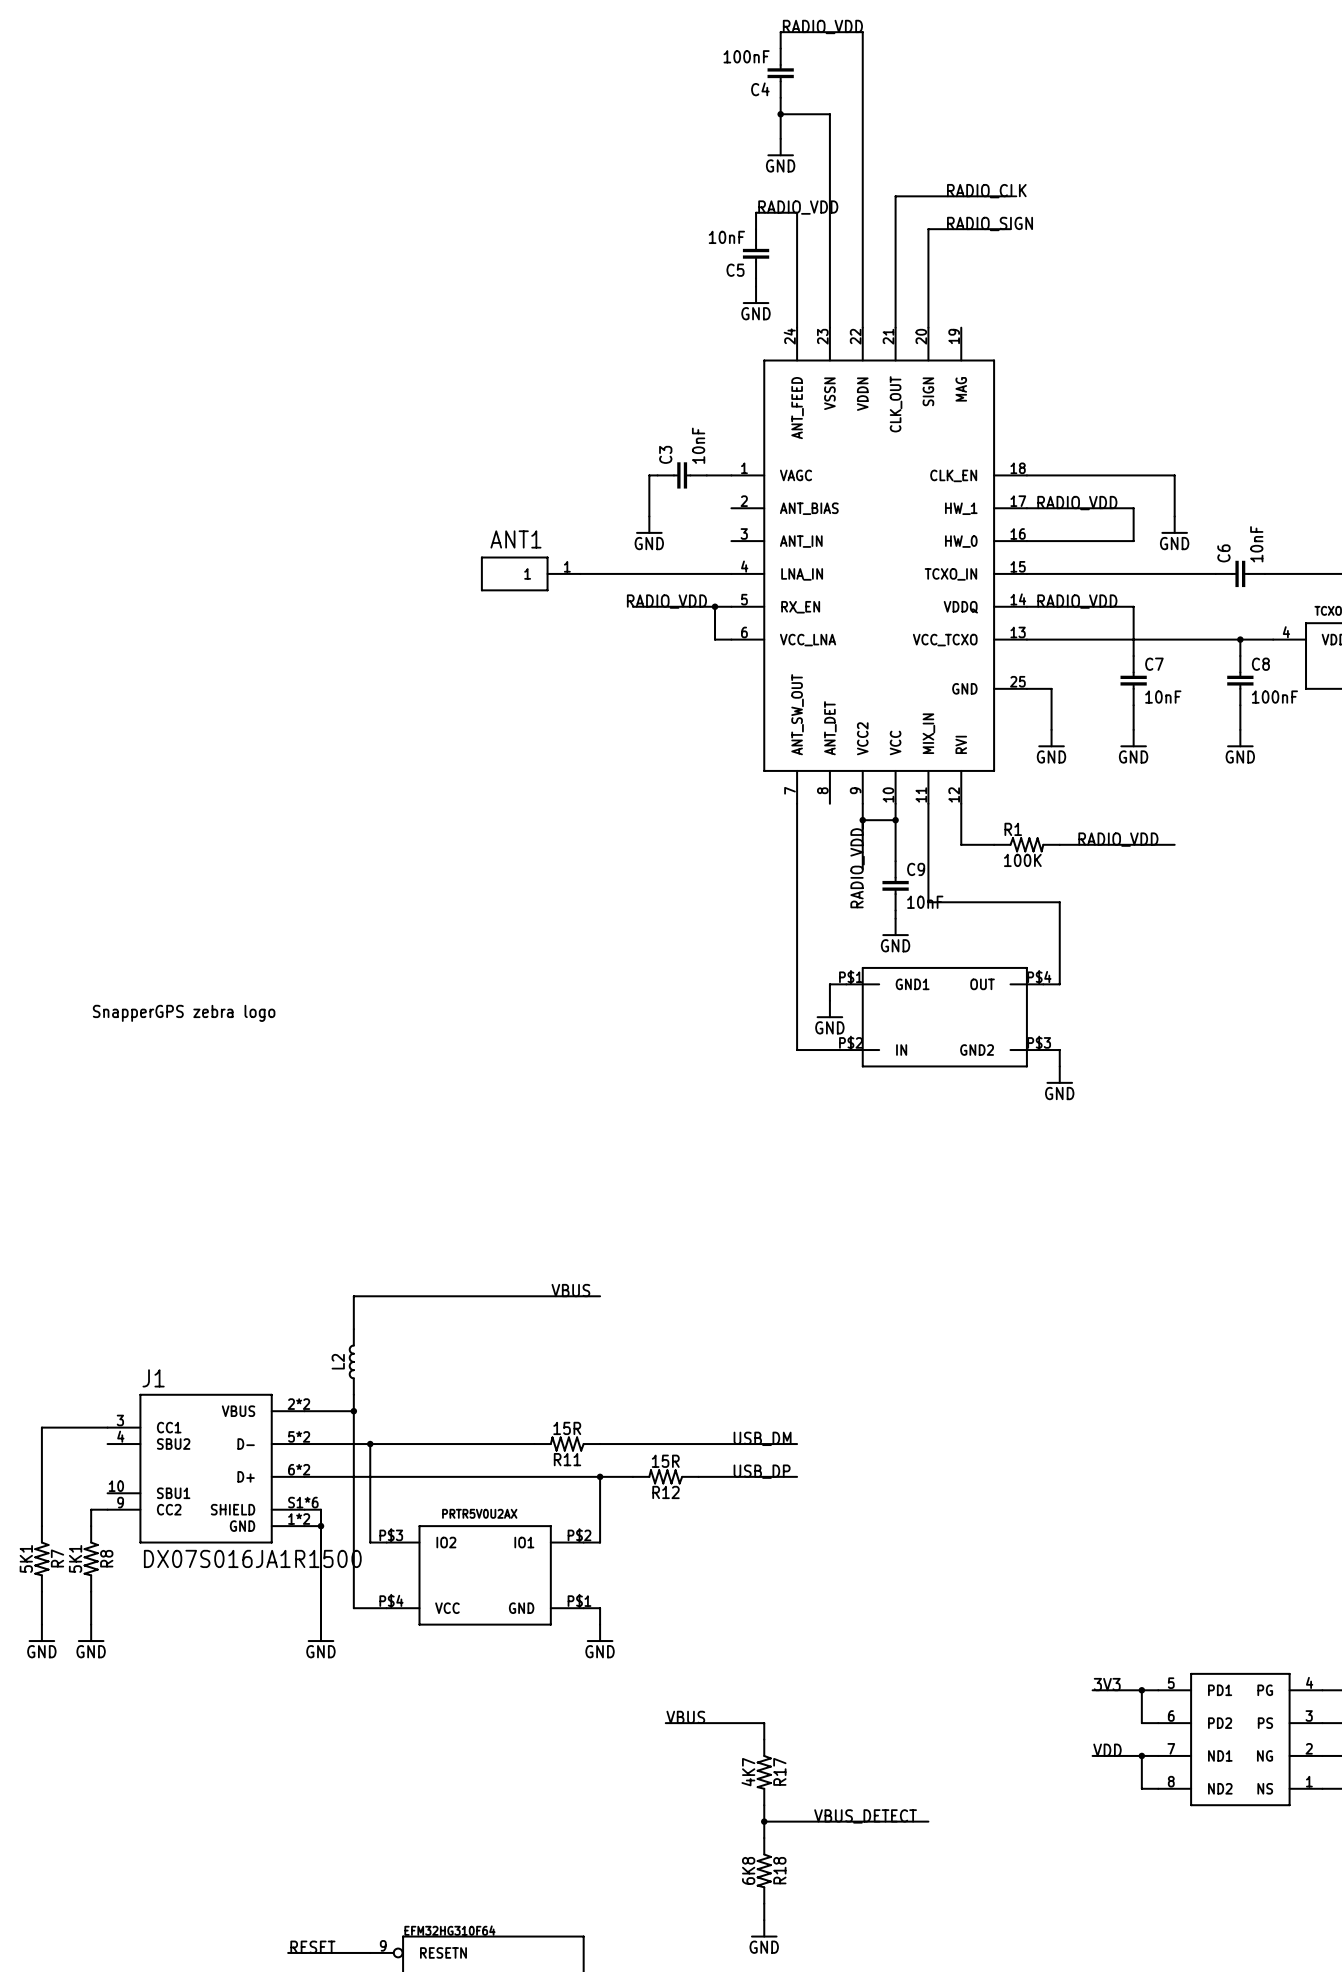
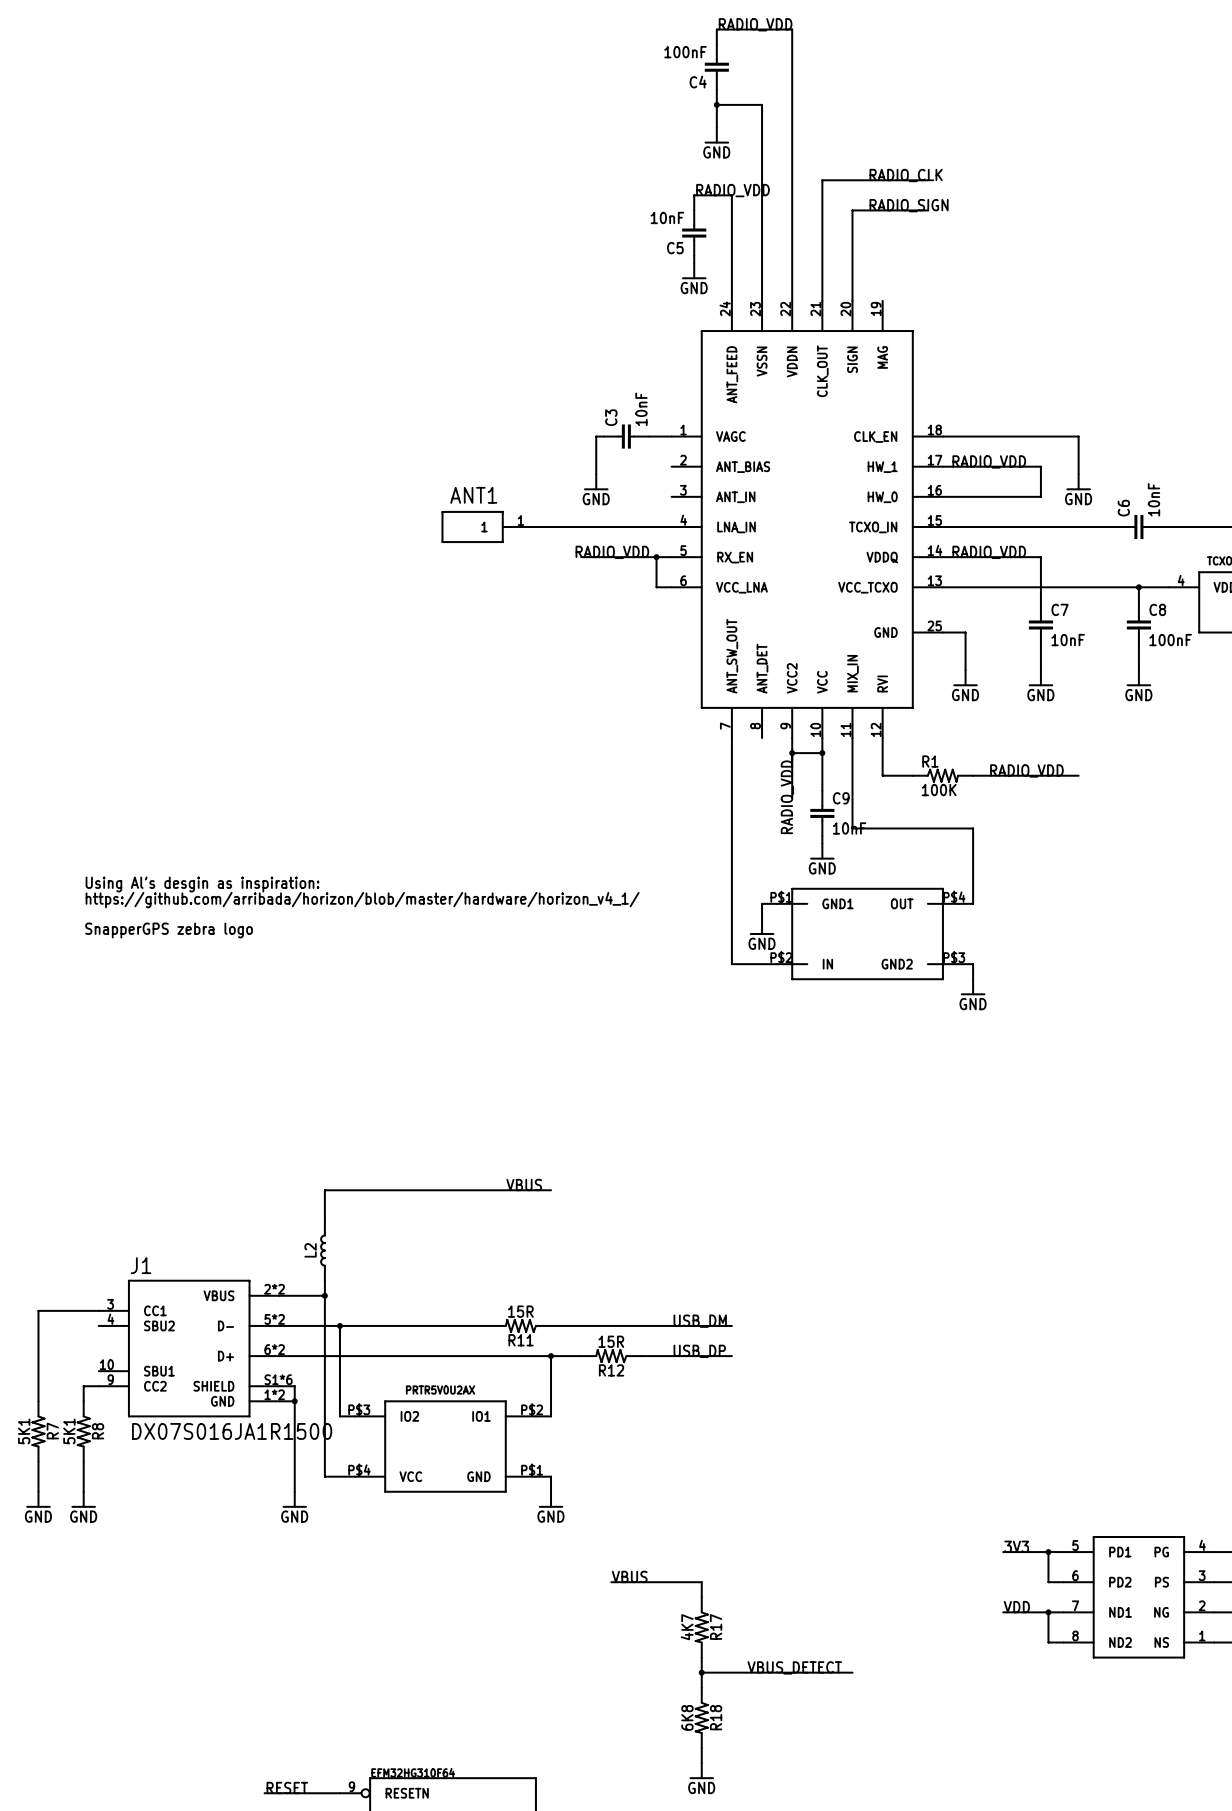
text: none -> Using Al's desgin as inspiration: (202, 884)
text: none -> https://github.com/arribada/horizon/blob/master/hardware/horizon_v4_1/ (362, 900)

